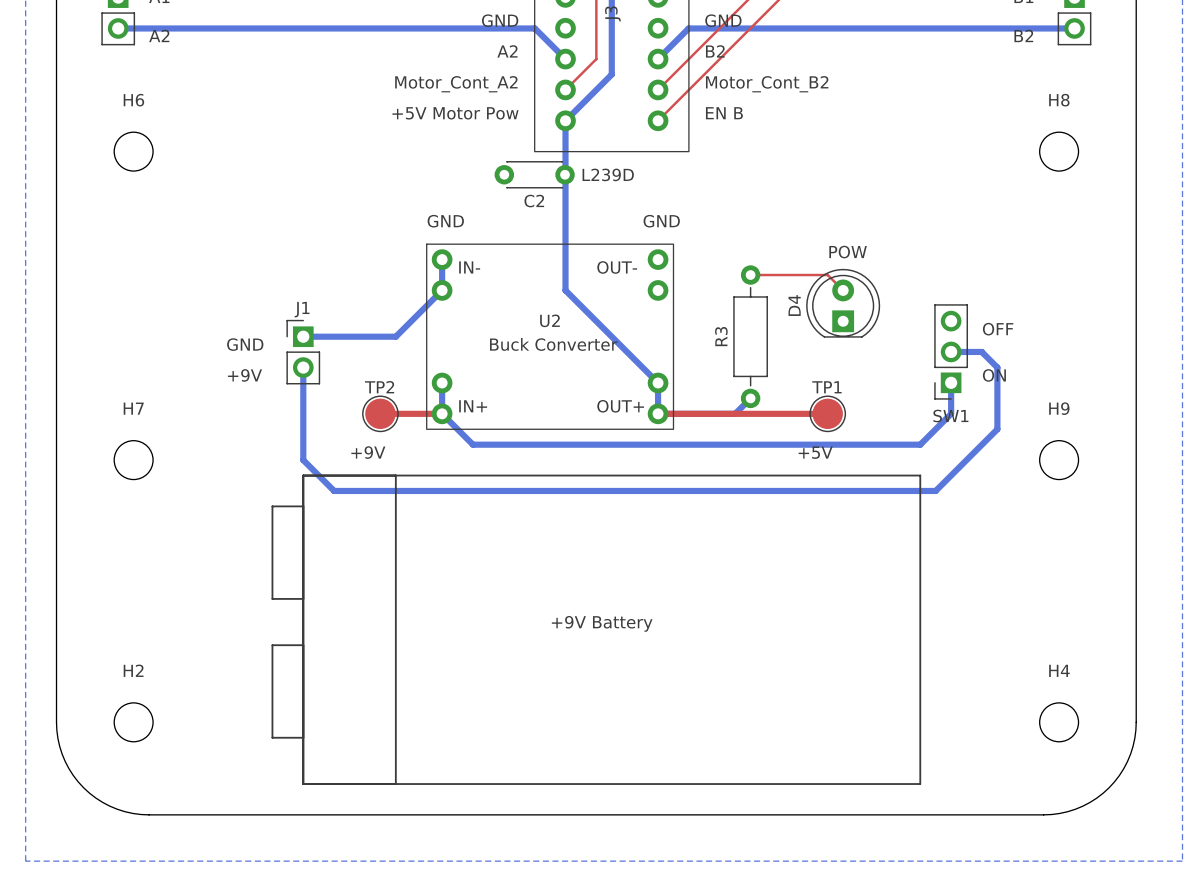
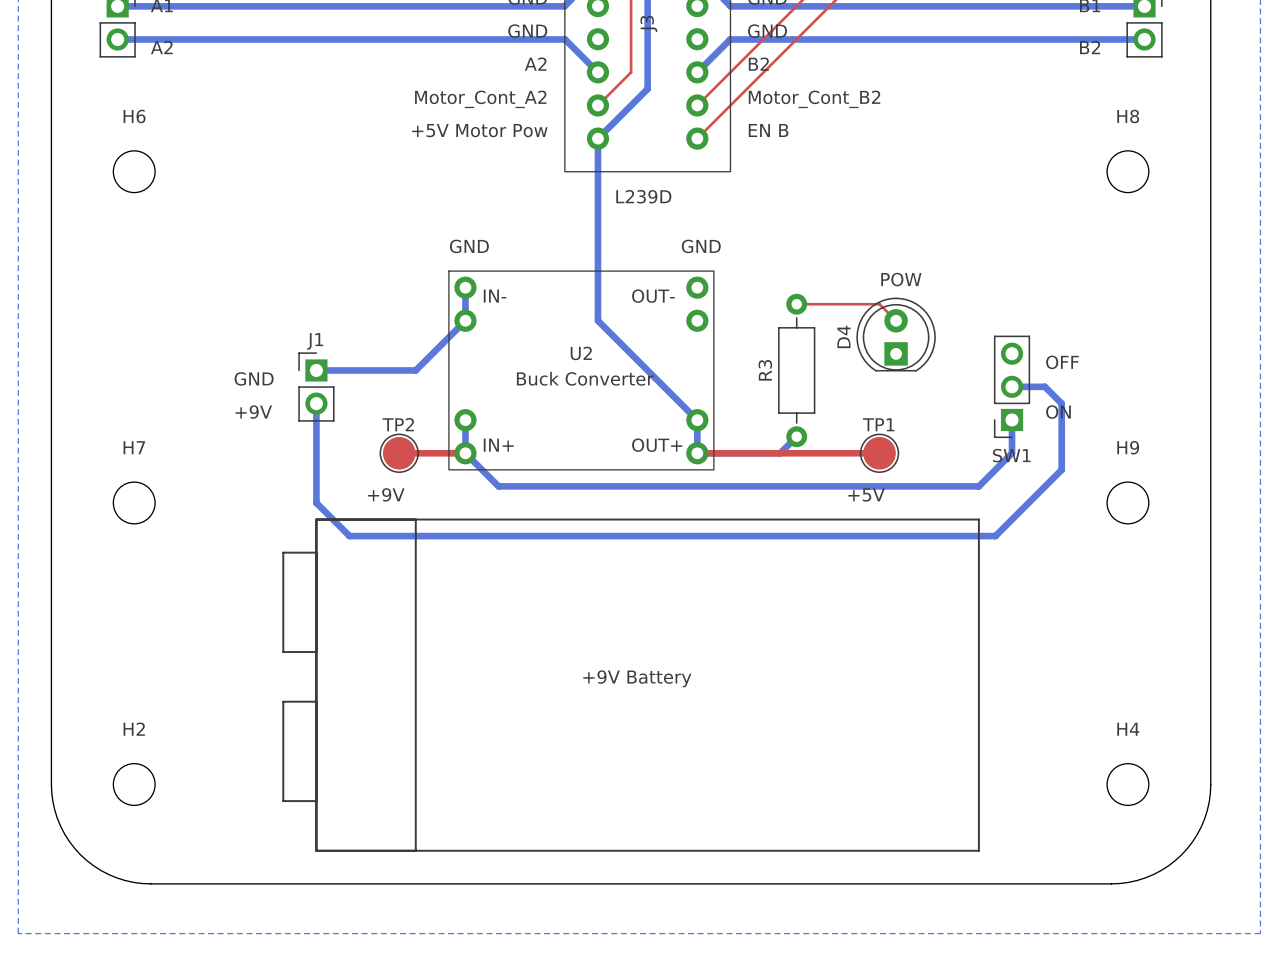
C2: (534, 174) -> none

